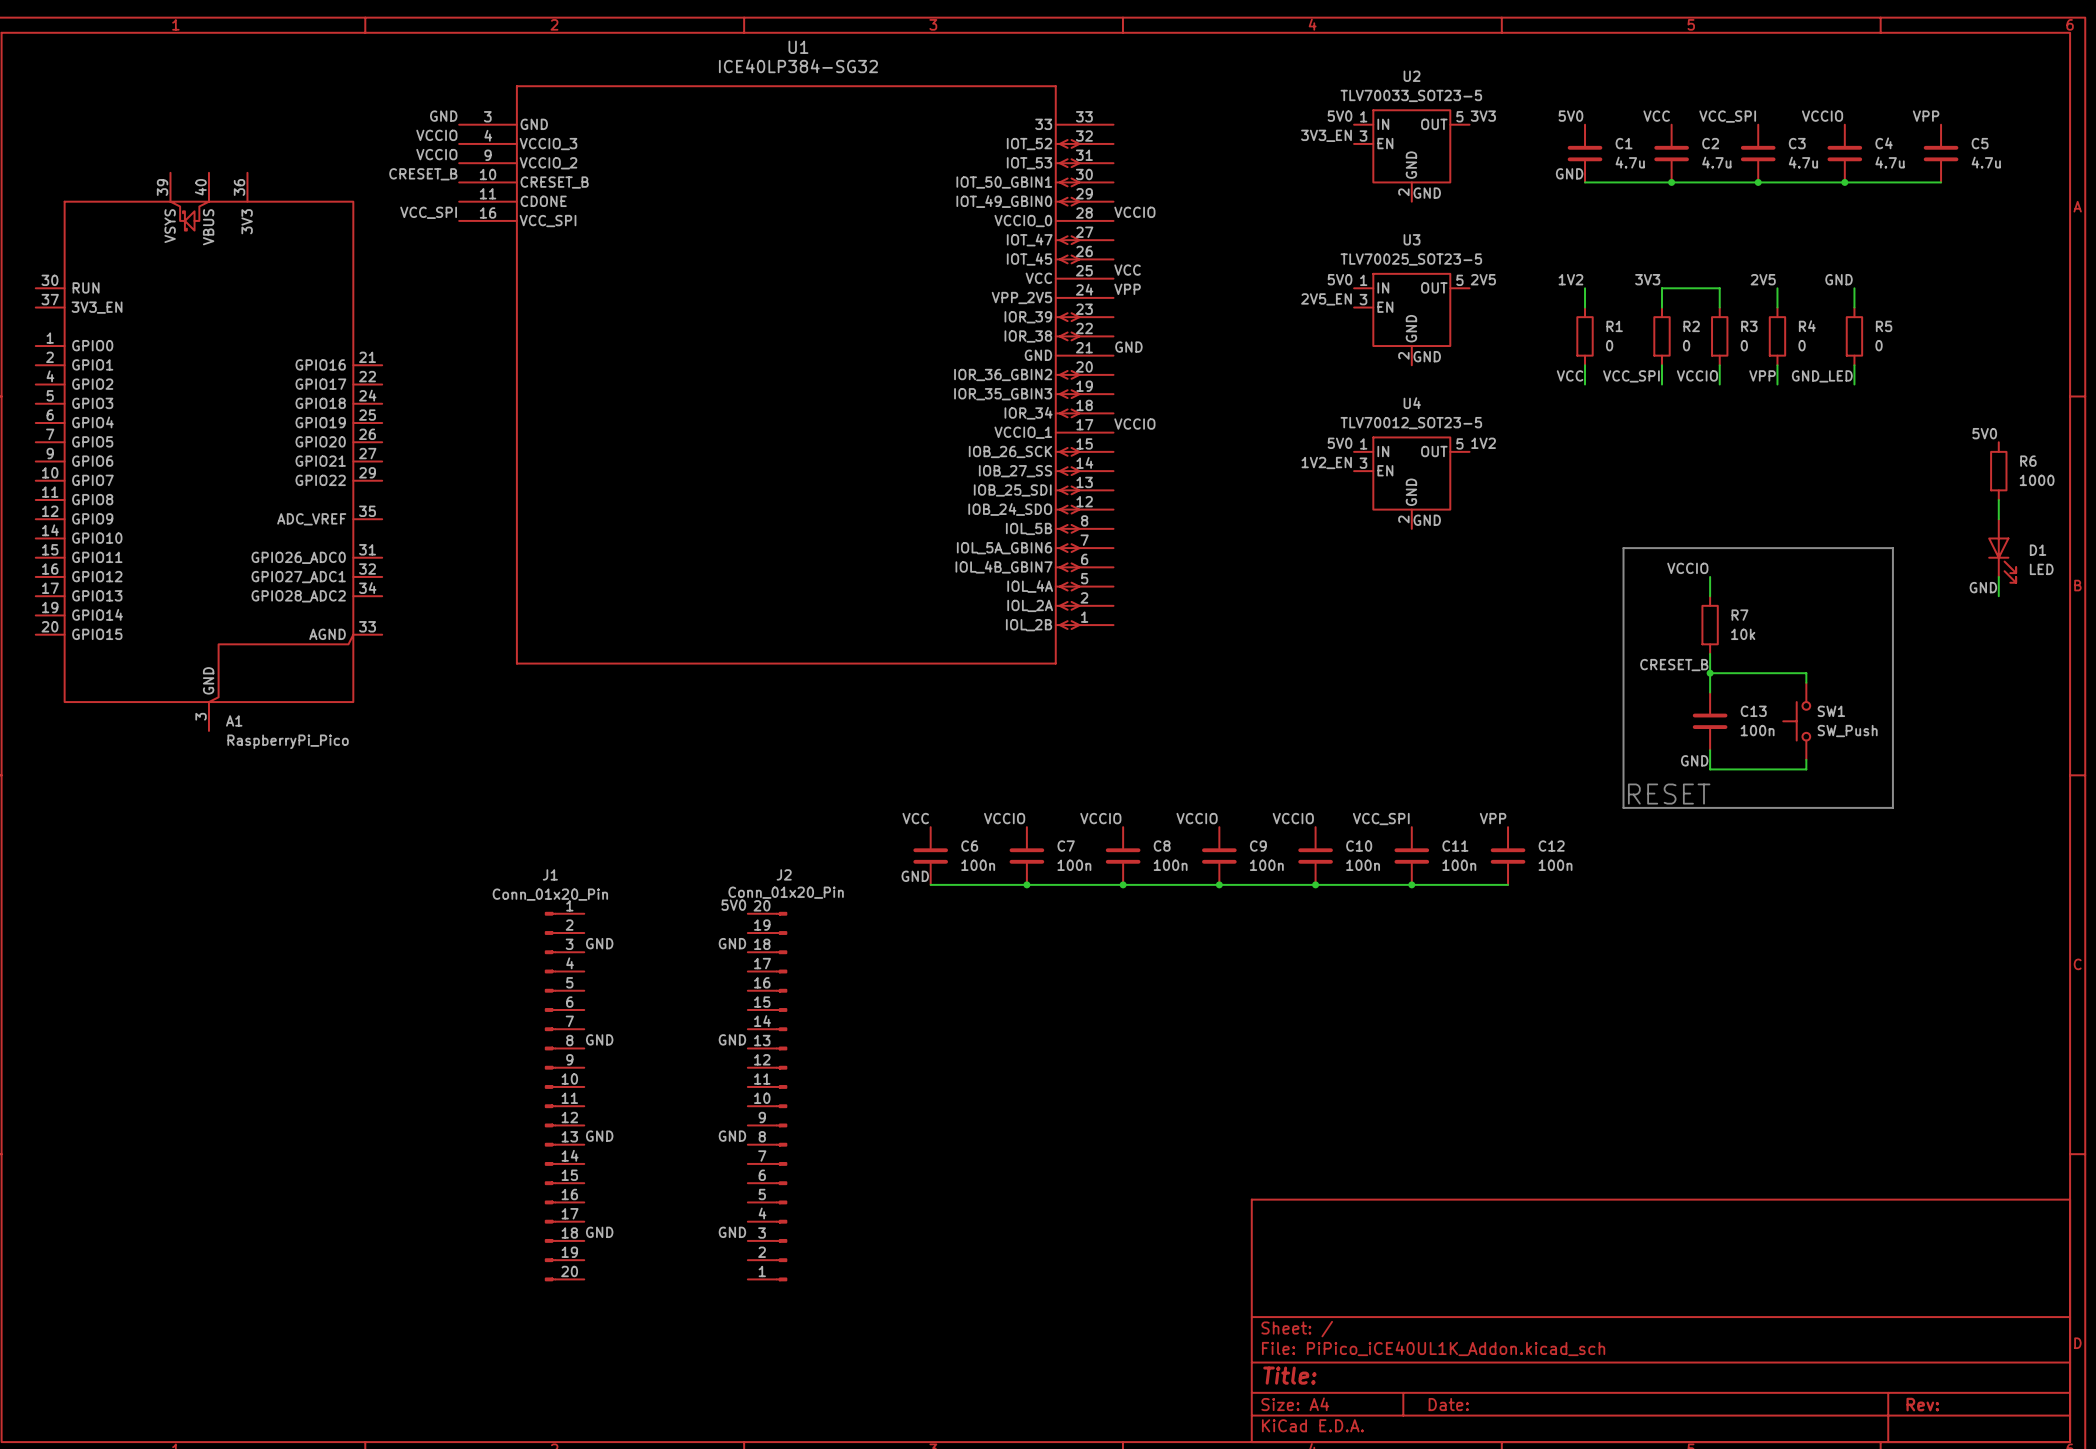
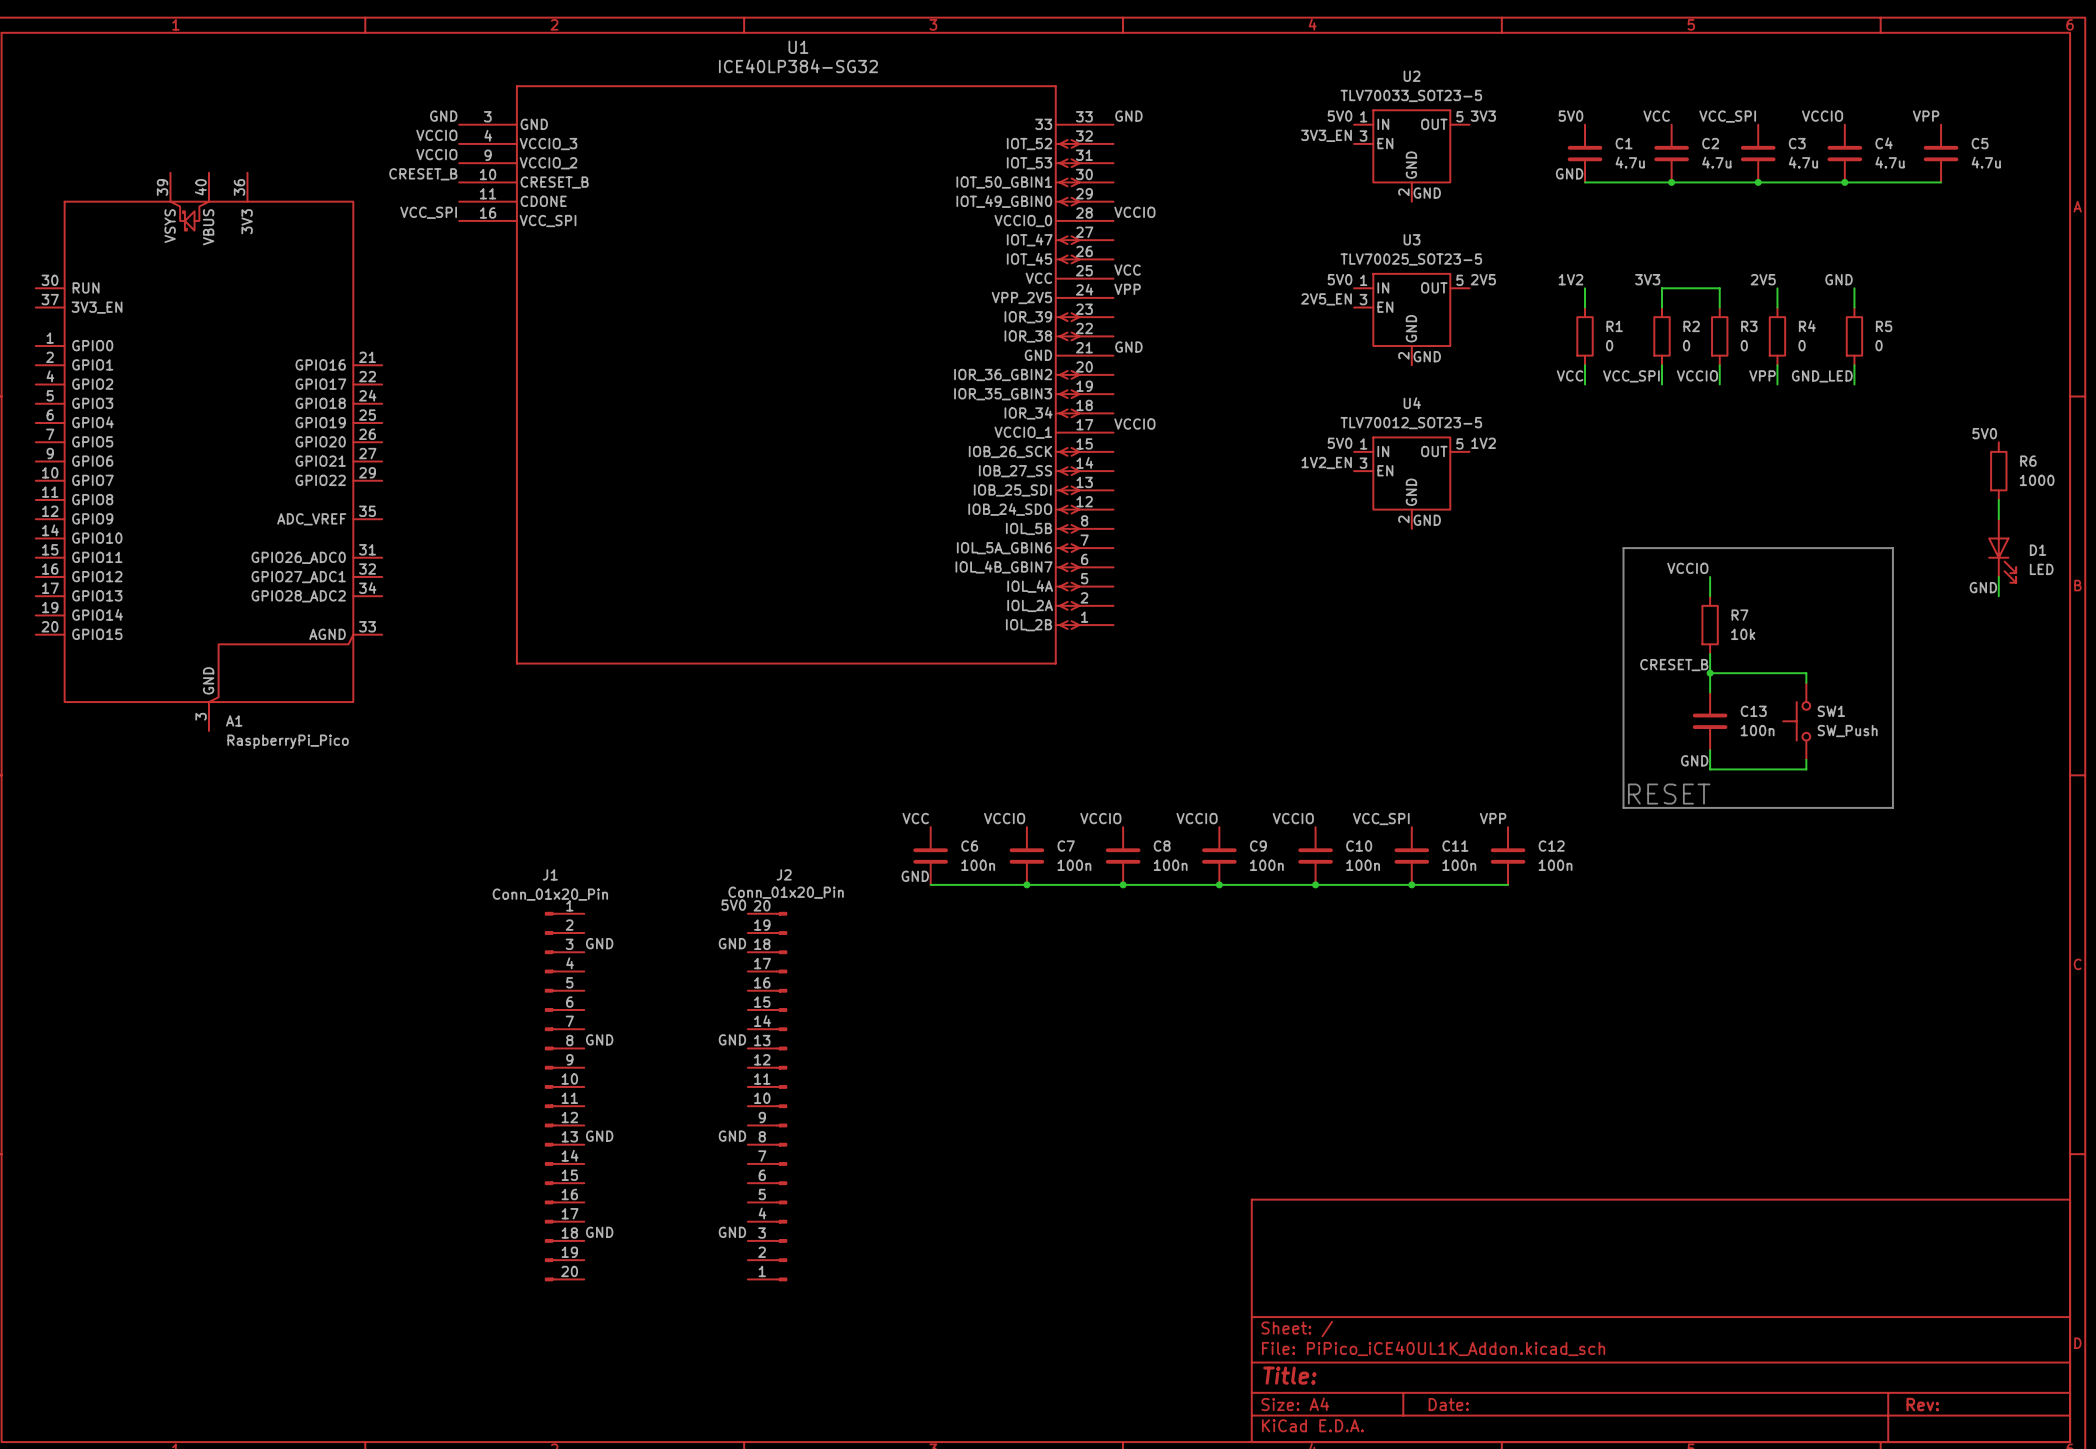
label: none -> GND (1128, 116)

